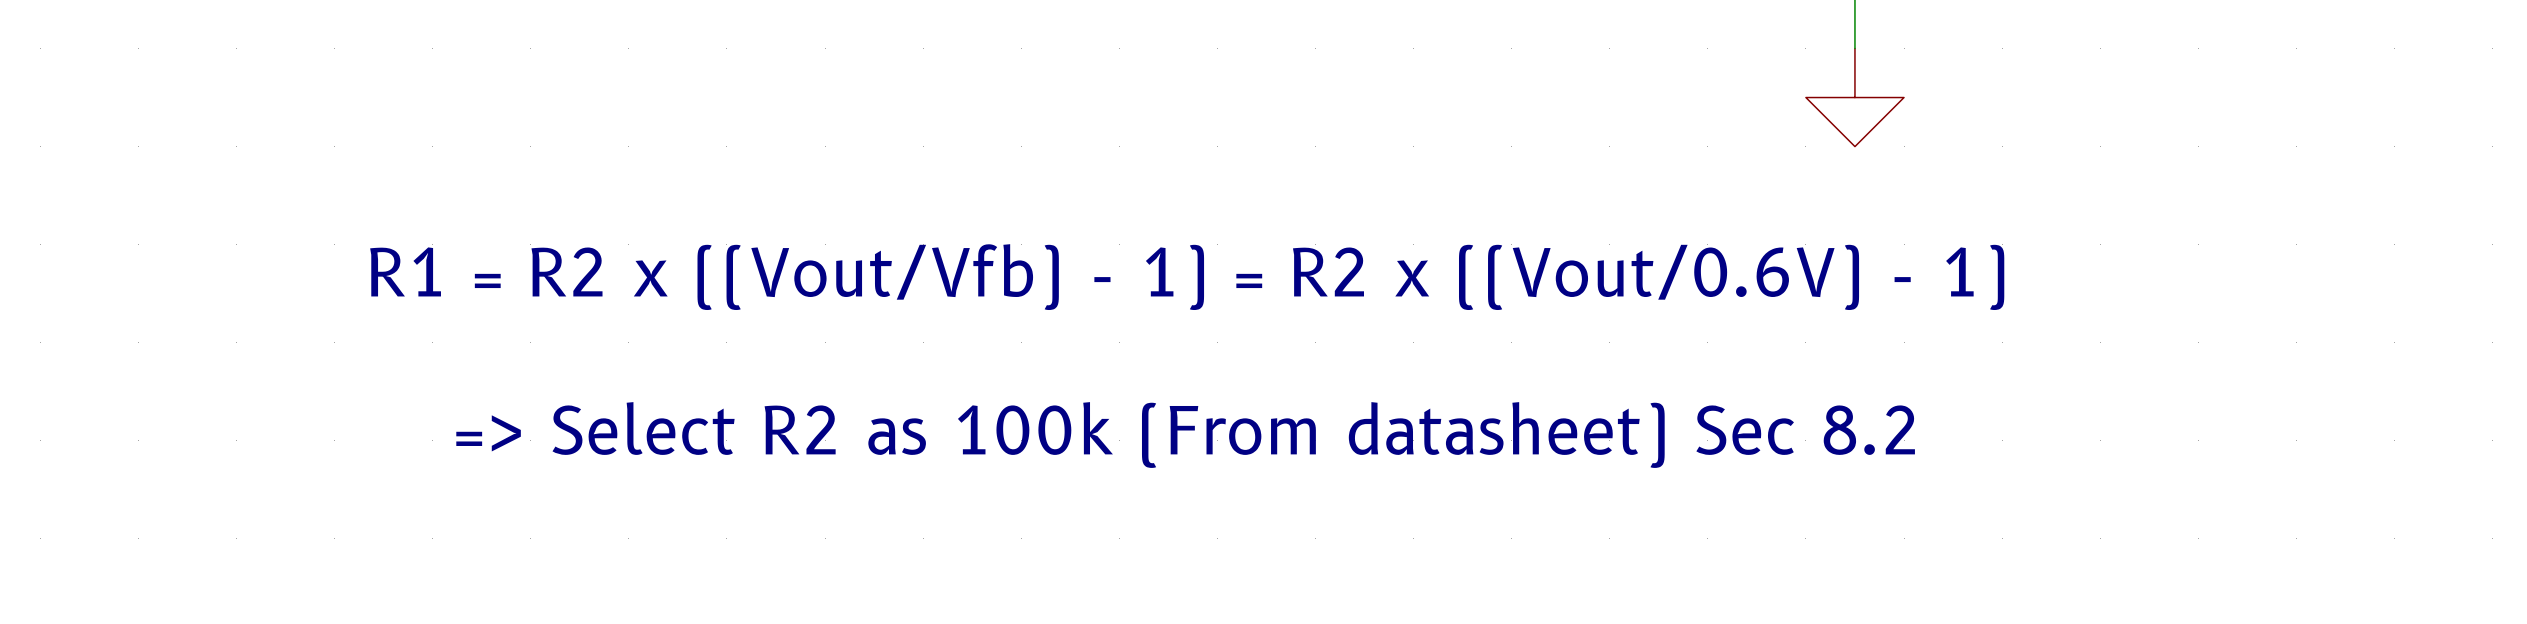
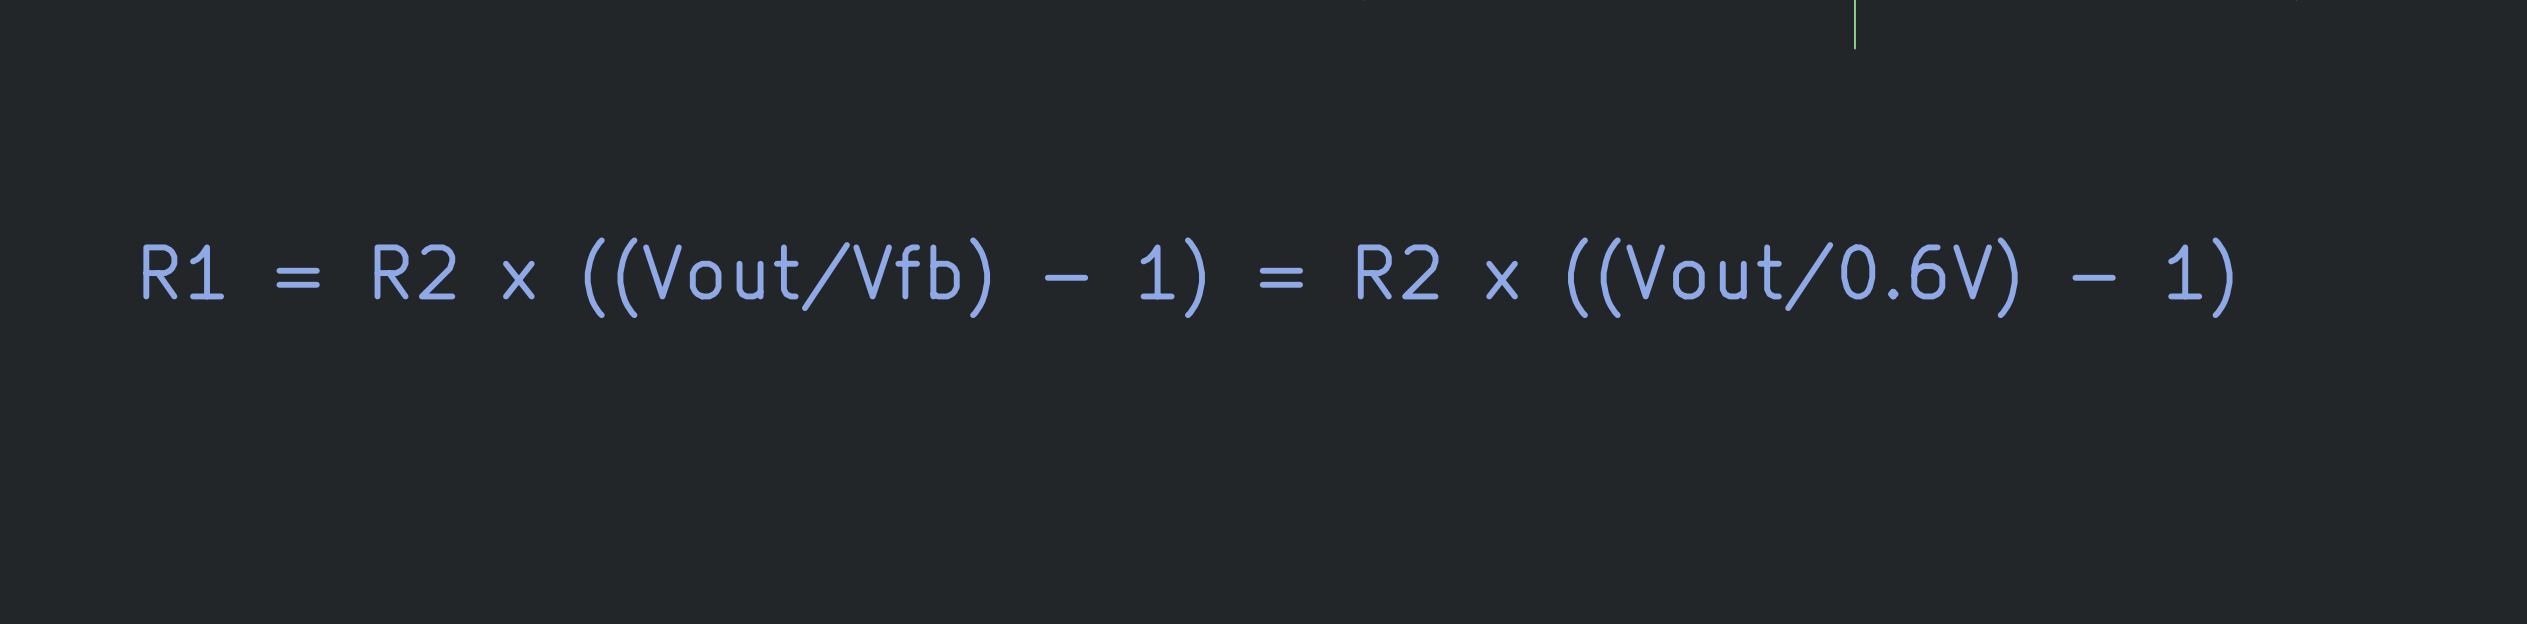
power symbol: (1854, 97) -> none
text: => Select R2 as 100k (From datasheet) Sec 8.2 (1185, 435) -> none

